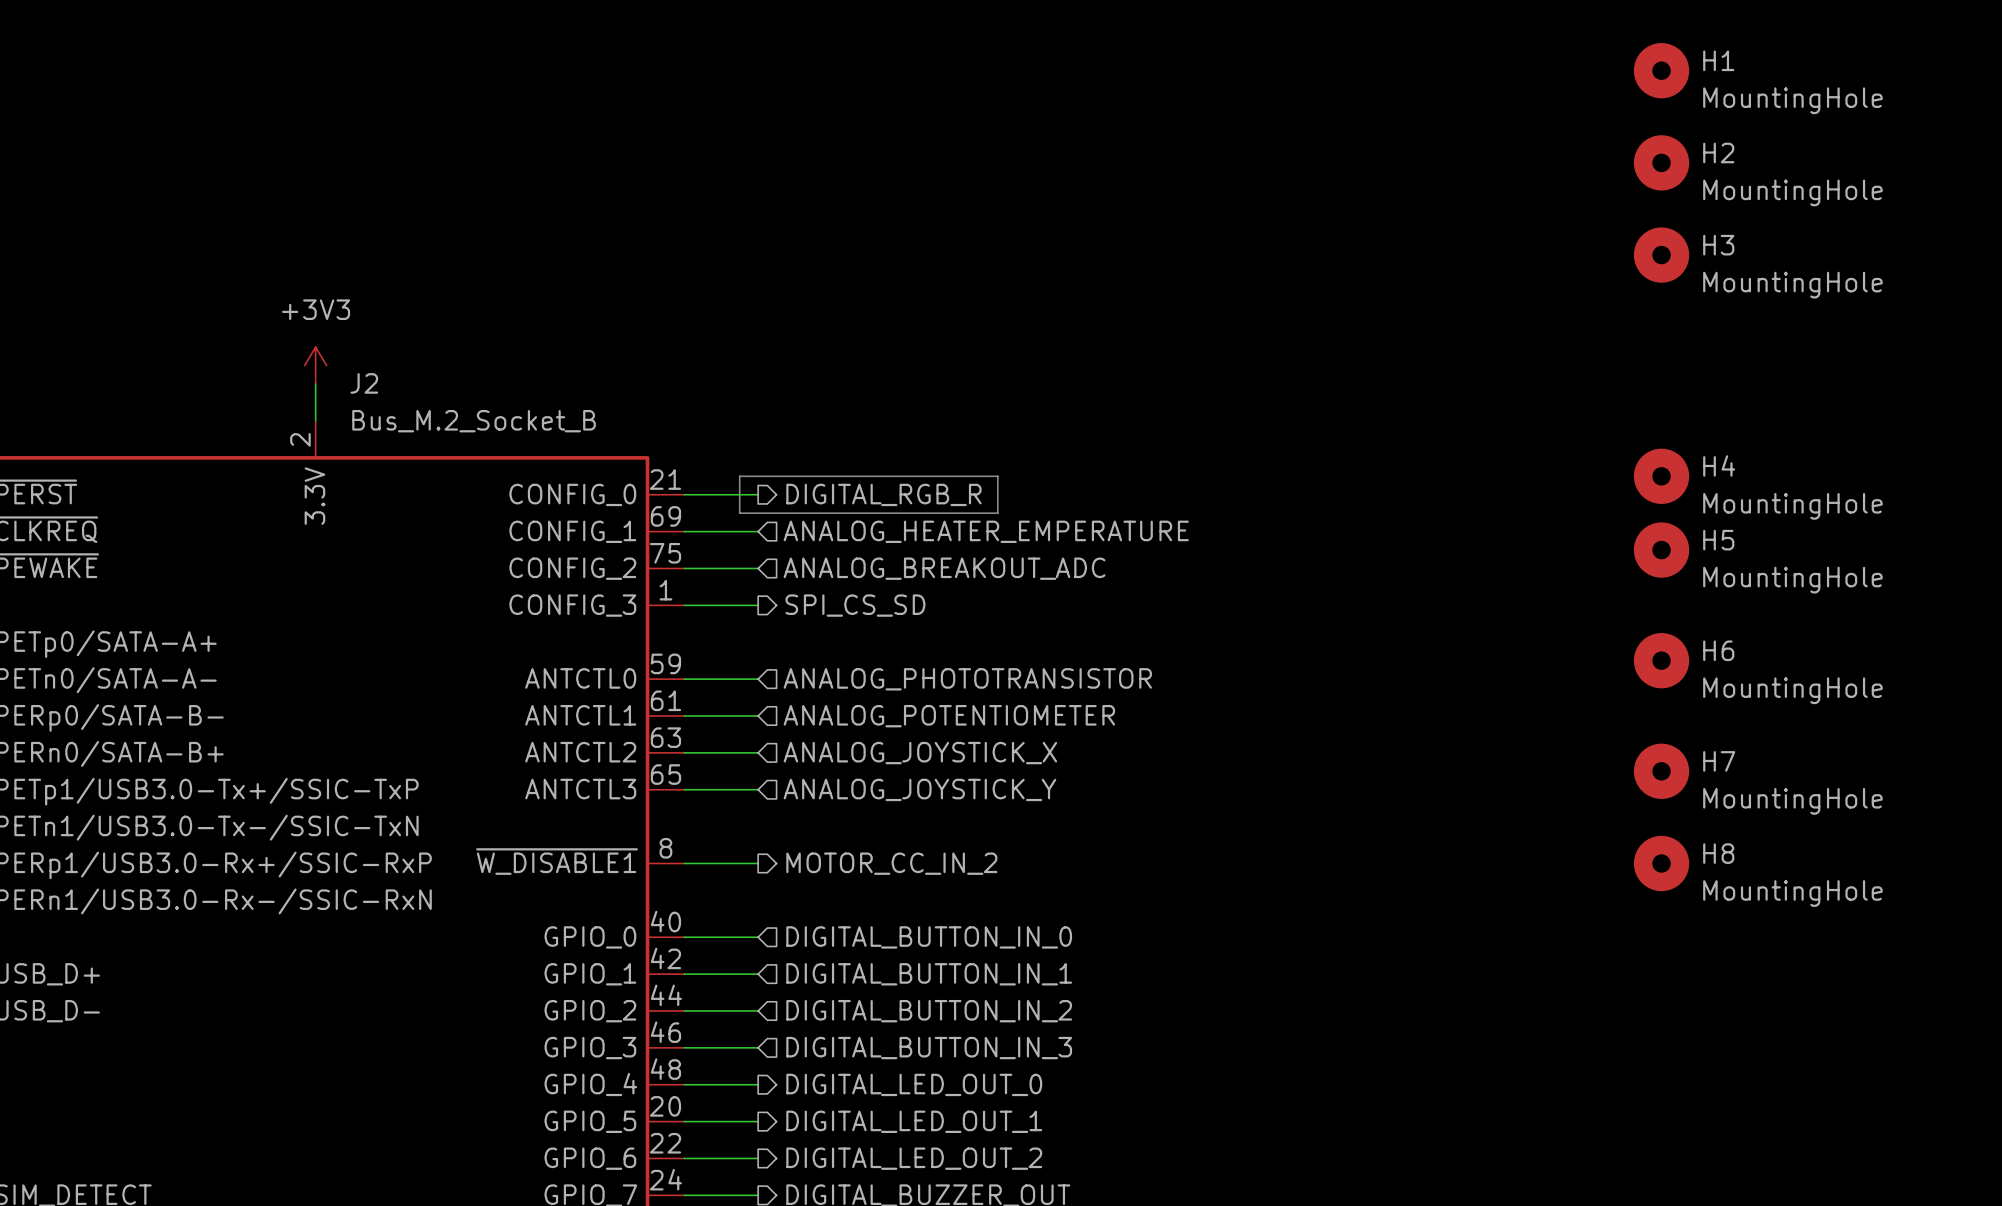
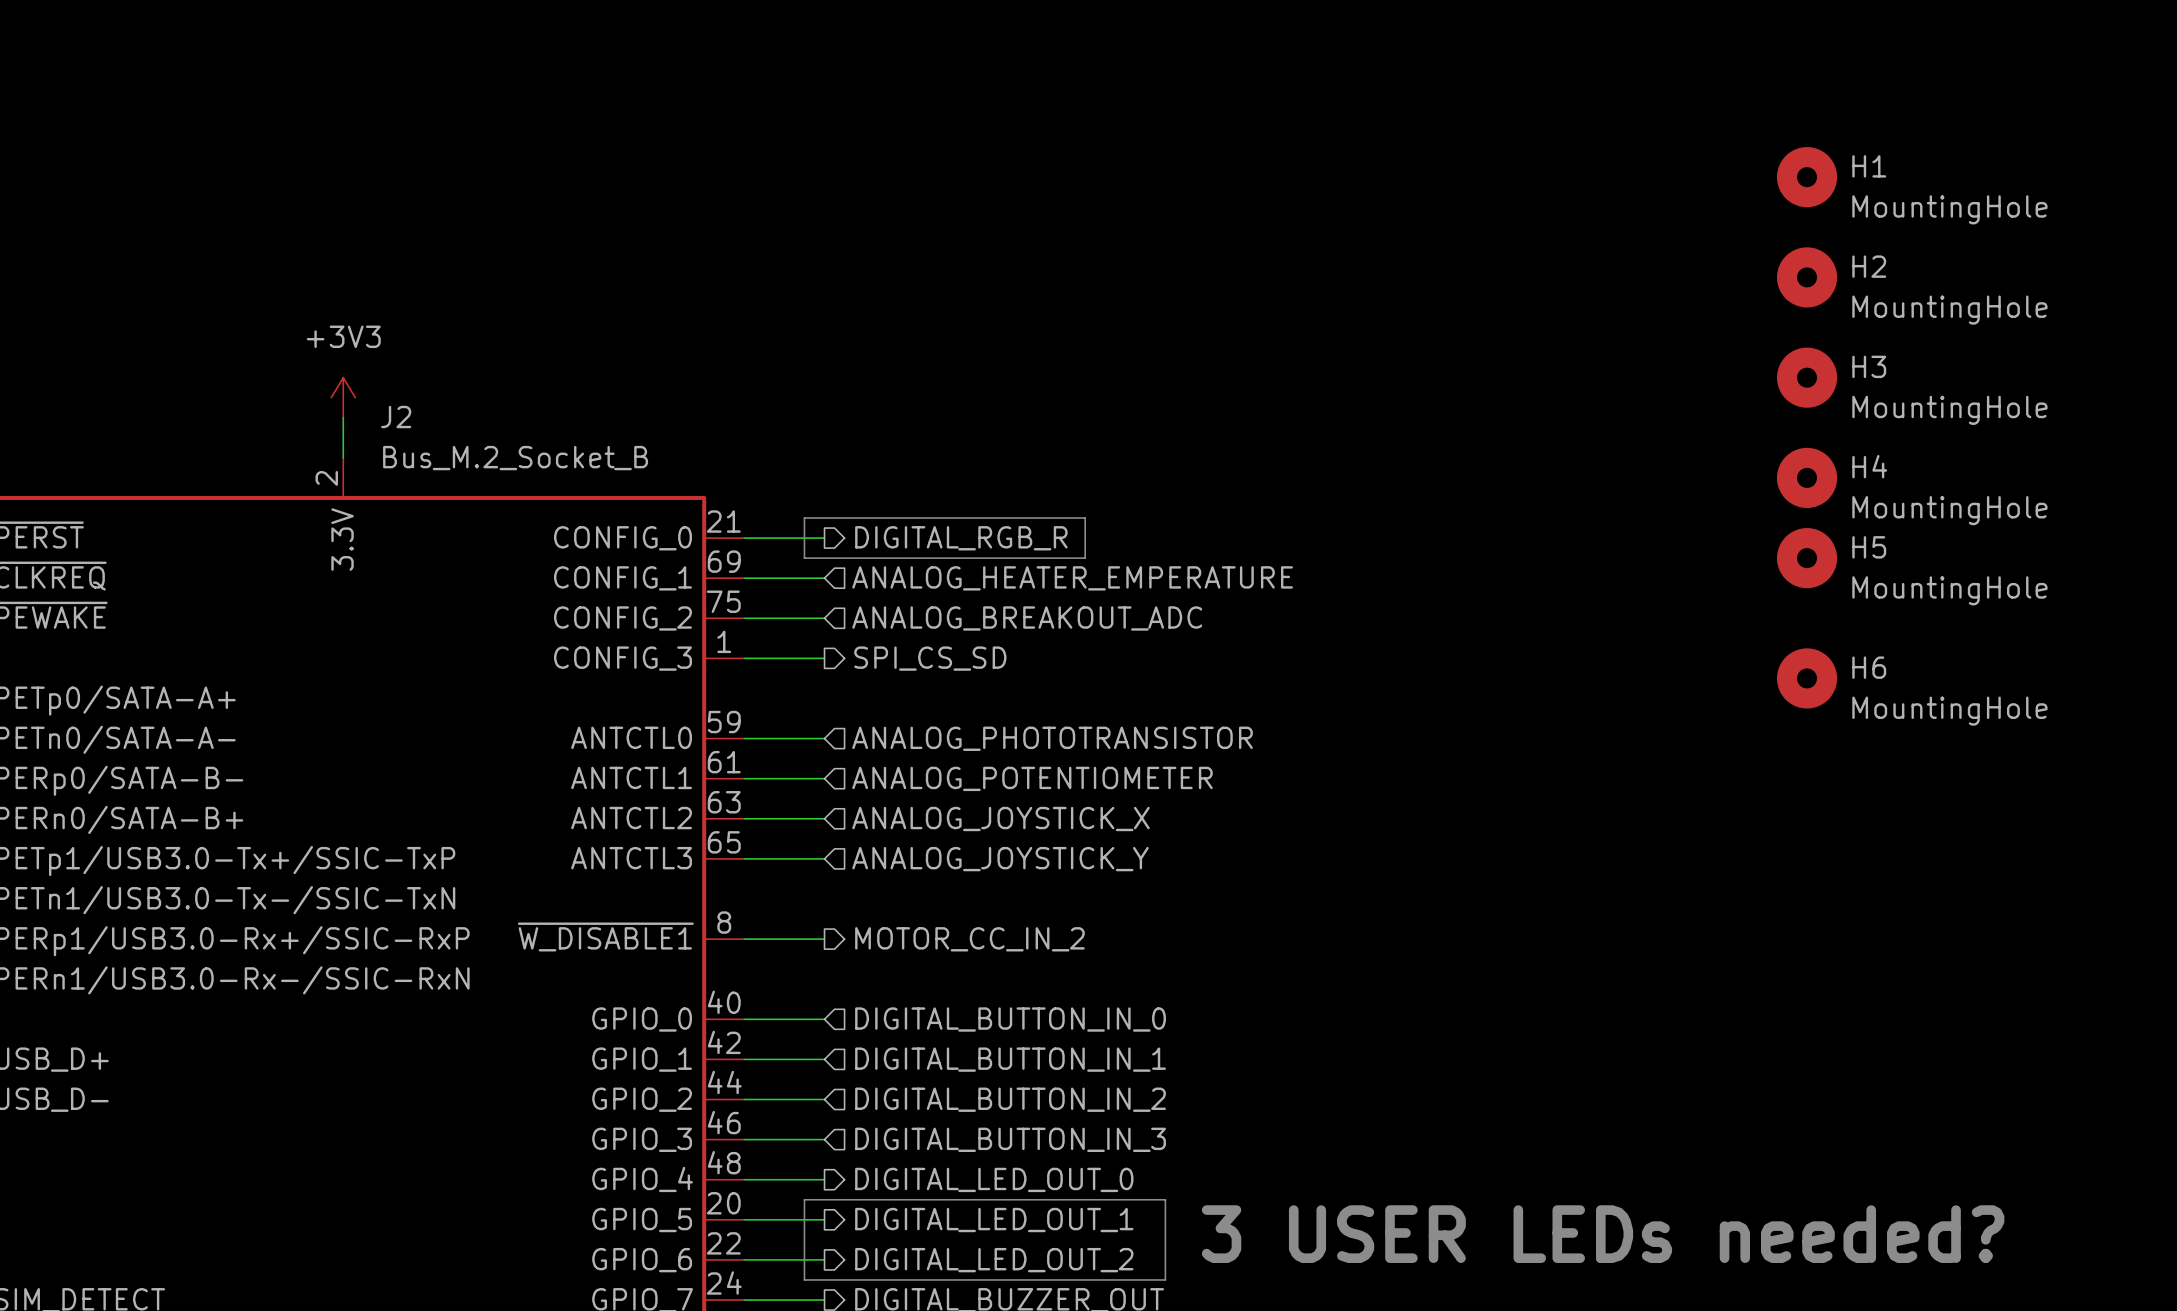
H1: MountingHole (1661, 70) -> none
H2 name: H2 (1718, 152) -> H1 (1869, 166)
H3 name: H3 (1718, 245) -> H2 (1869, 266)
H3: none -> MountingHole (1807, 377)
H4 position: (1661, 476) -> (1807, 477)
H5 position: (1661, 550) -> (1807, 558)
H6 position: (1661, 660) -> (1807, 678)
H7: MountingHole (1661, 771) -> none
H8: MountingHole (1661, 863) -> none
line: none -> (804, 1199) (1165, 1199) (1165, 1279) (804, 1279) (804, 1199)
text: none -> 3 USER LEDs needed? (1603, 1234)

